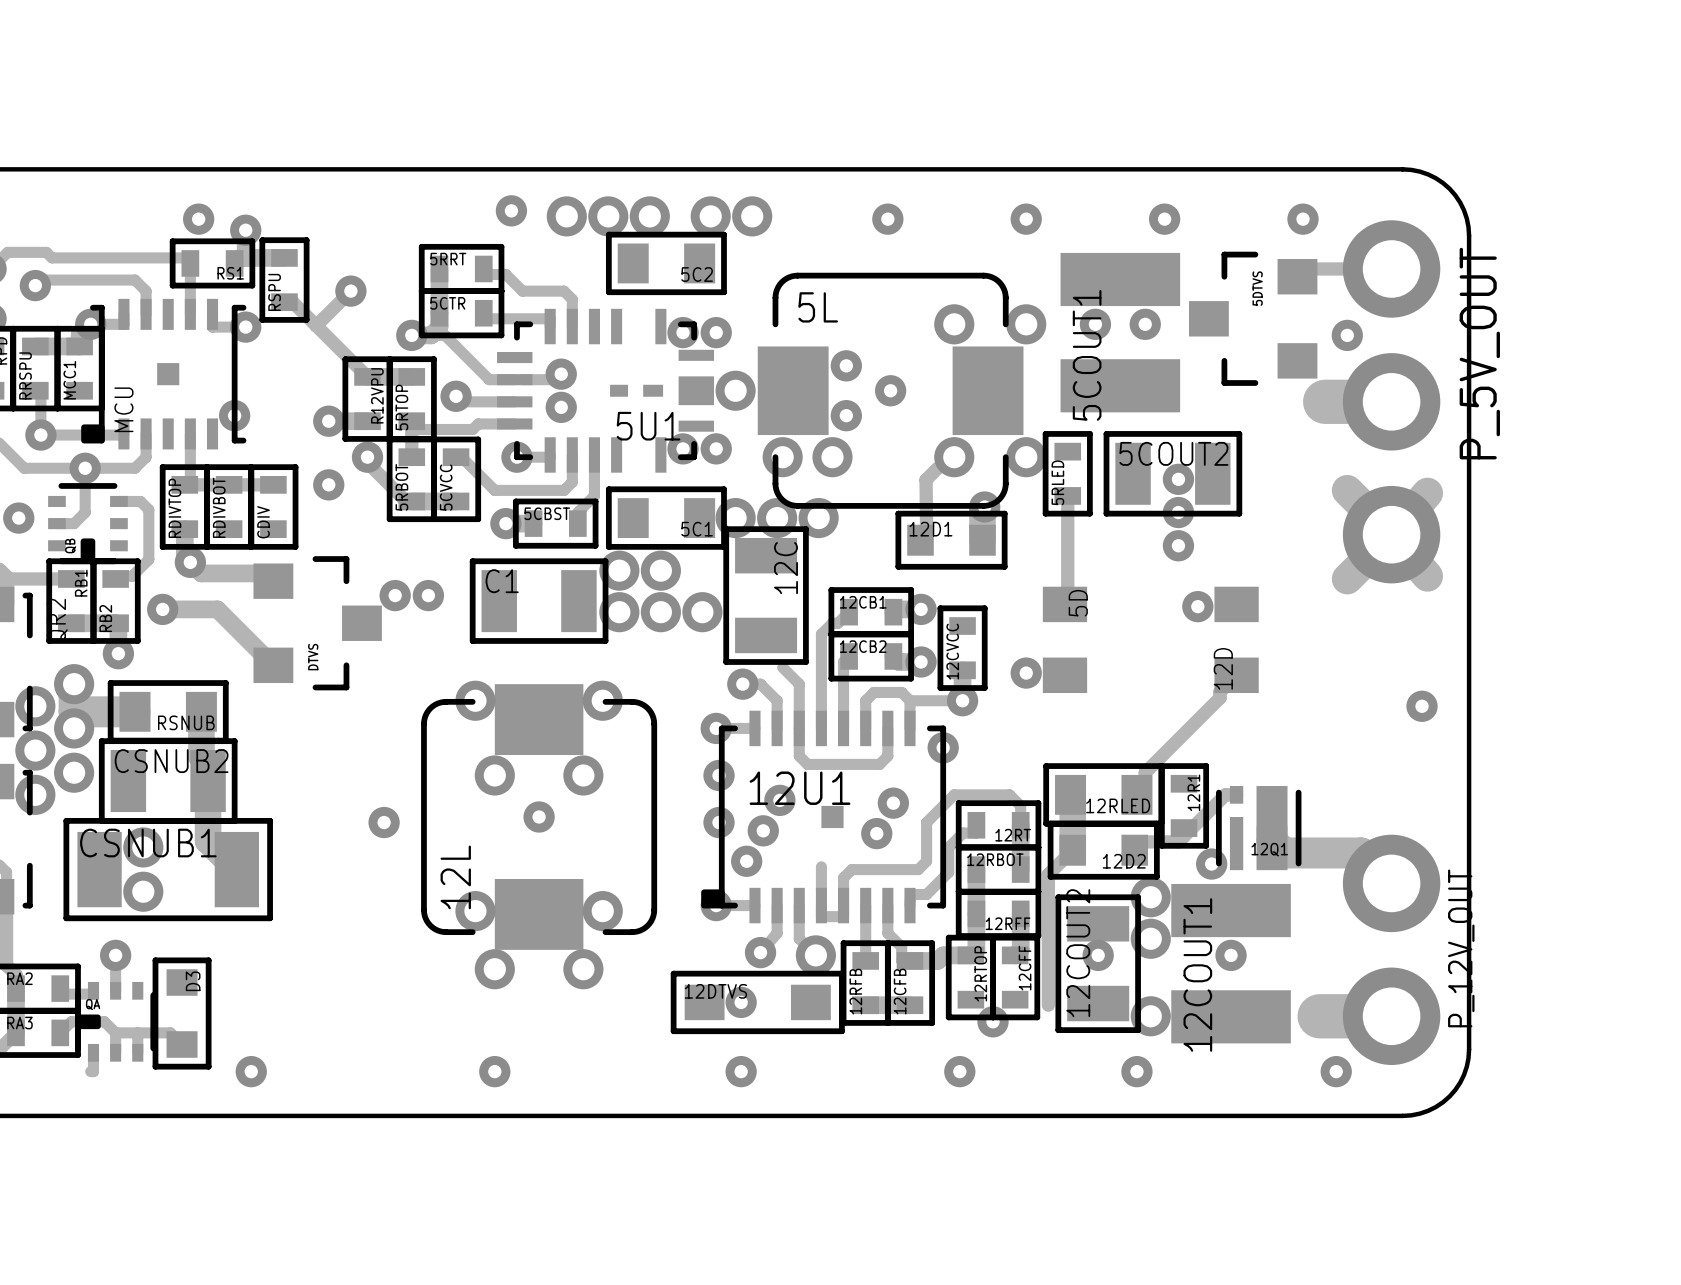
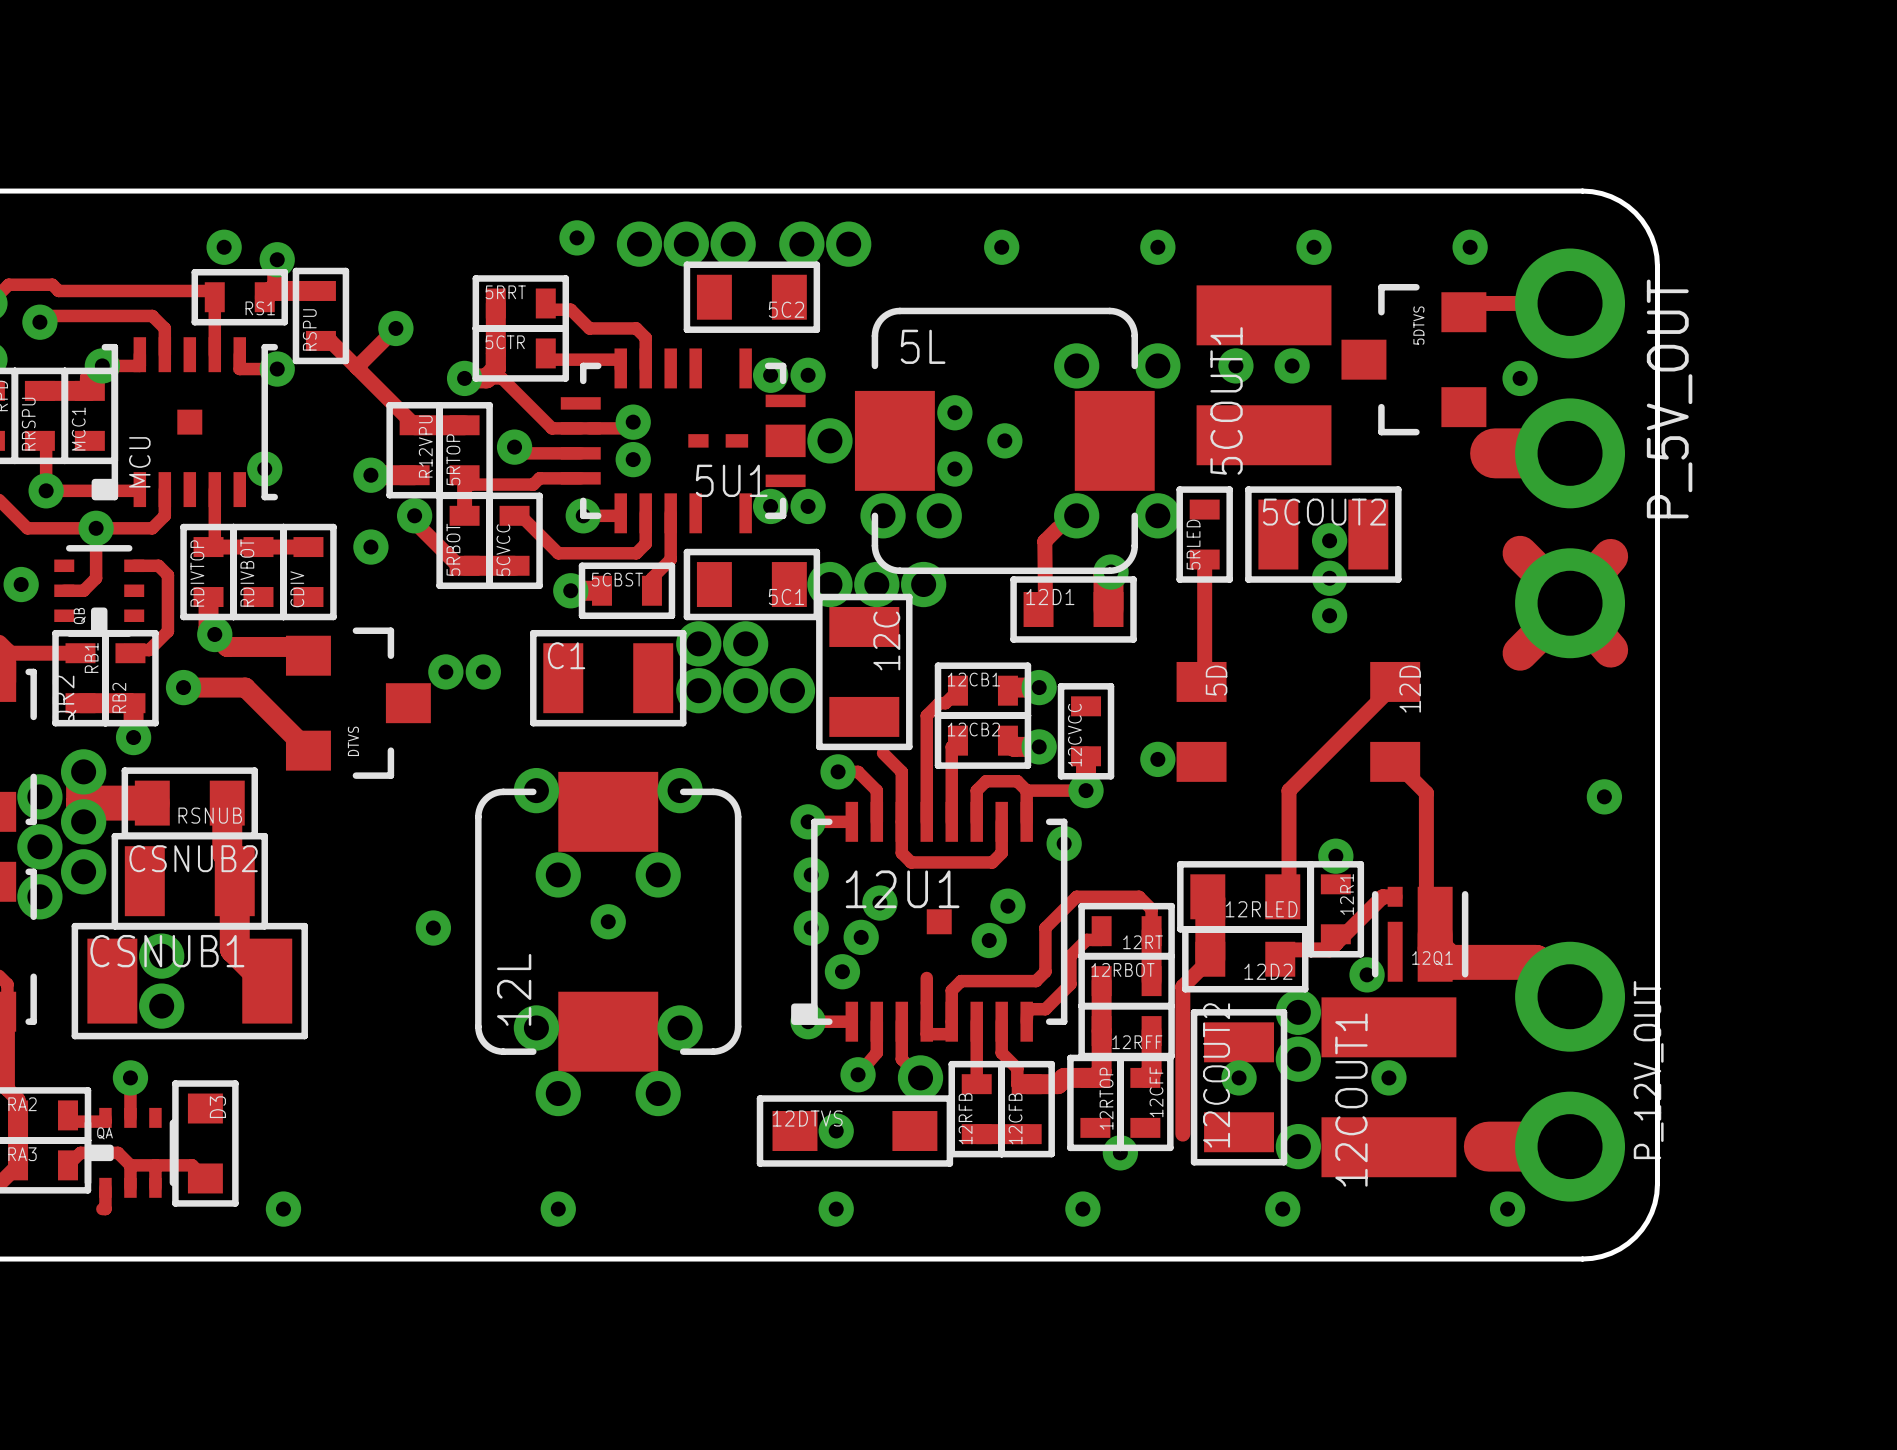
via position: (1197, 606) -> (1335, 856)
12D name position: 12D (1223, 668) -> 12D (1410, 689)
track: (1236, 675) (1219, 691) (1219, 697) (1145, 772) (1145, 786) (1142, 789) -> (1395, 681) (1395, 684) (1289, 790) (1289, 890)
track: none -> (1395, 761) (1426, 793) (1426, 925) (1435, 934)

